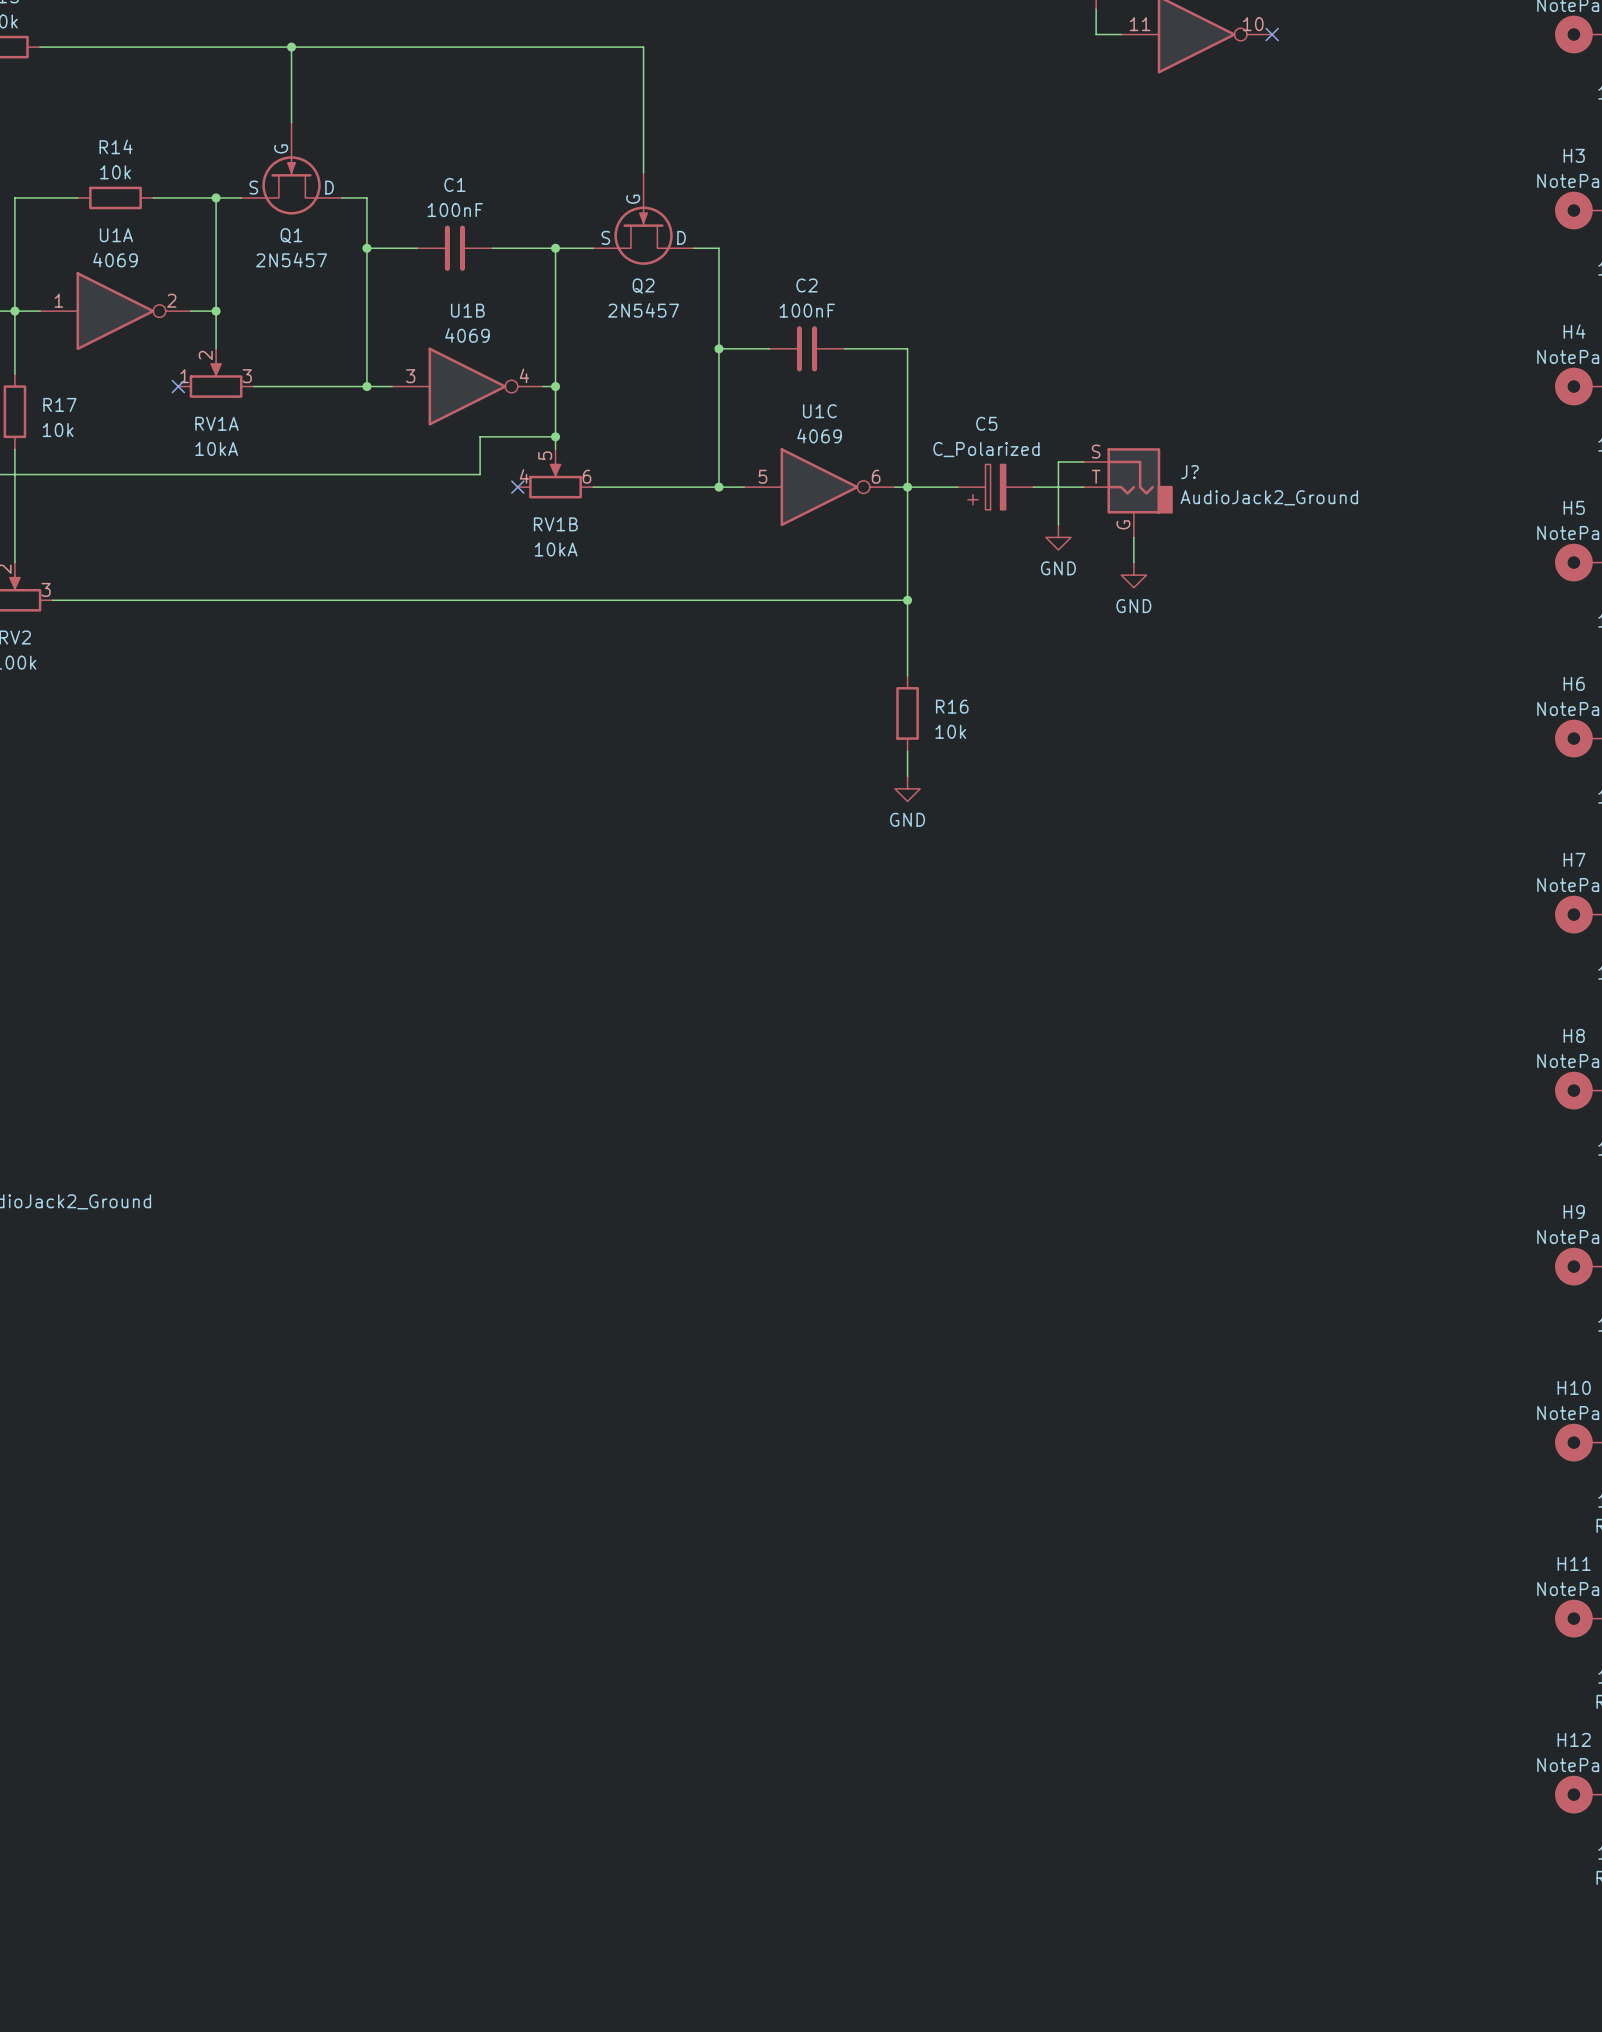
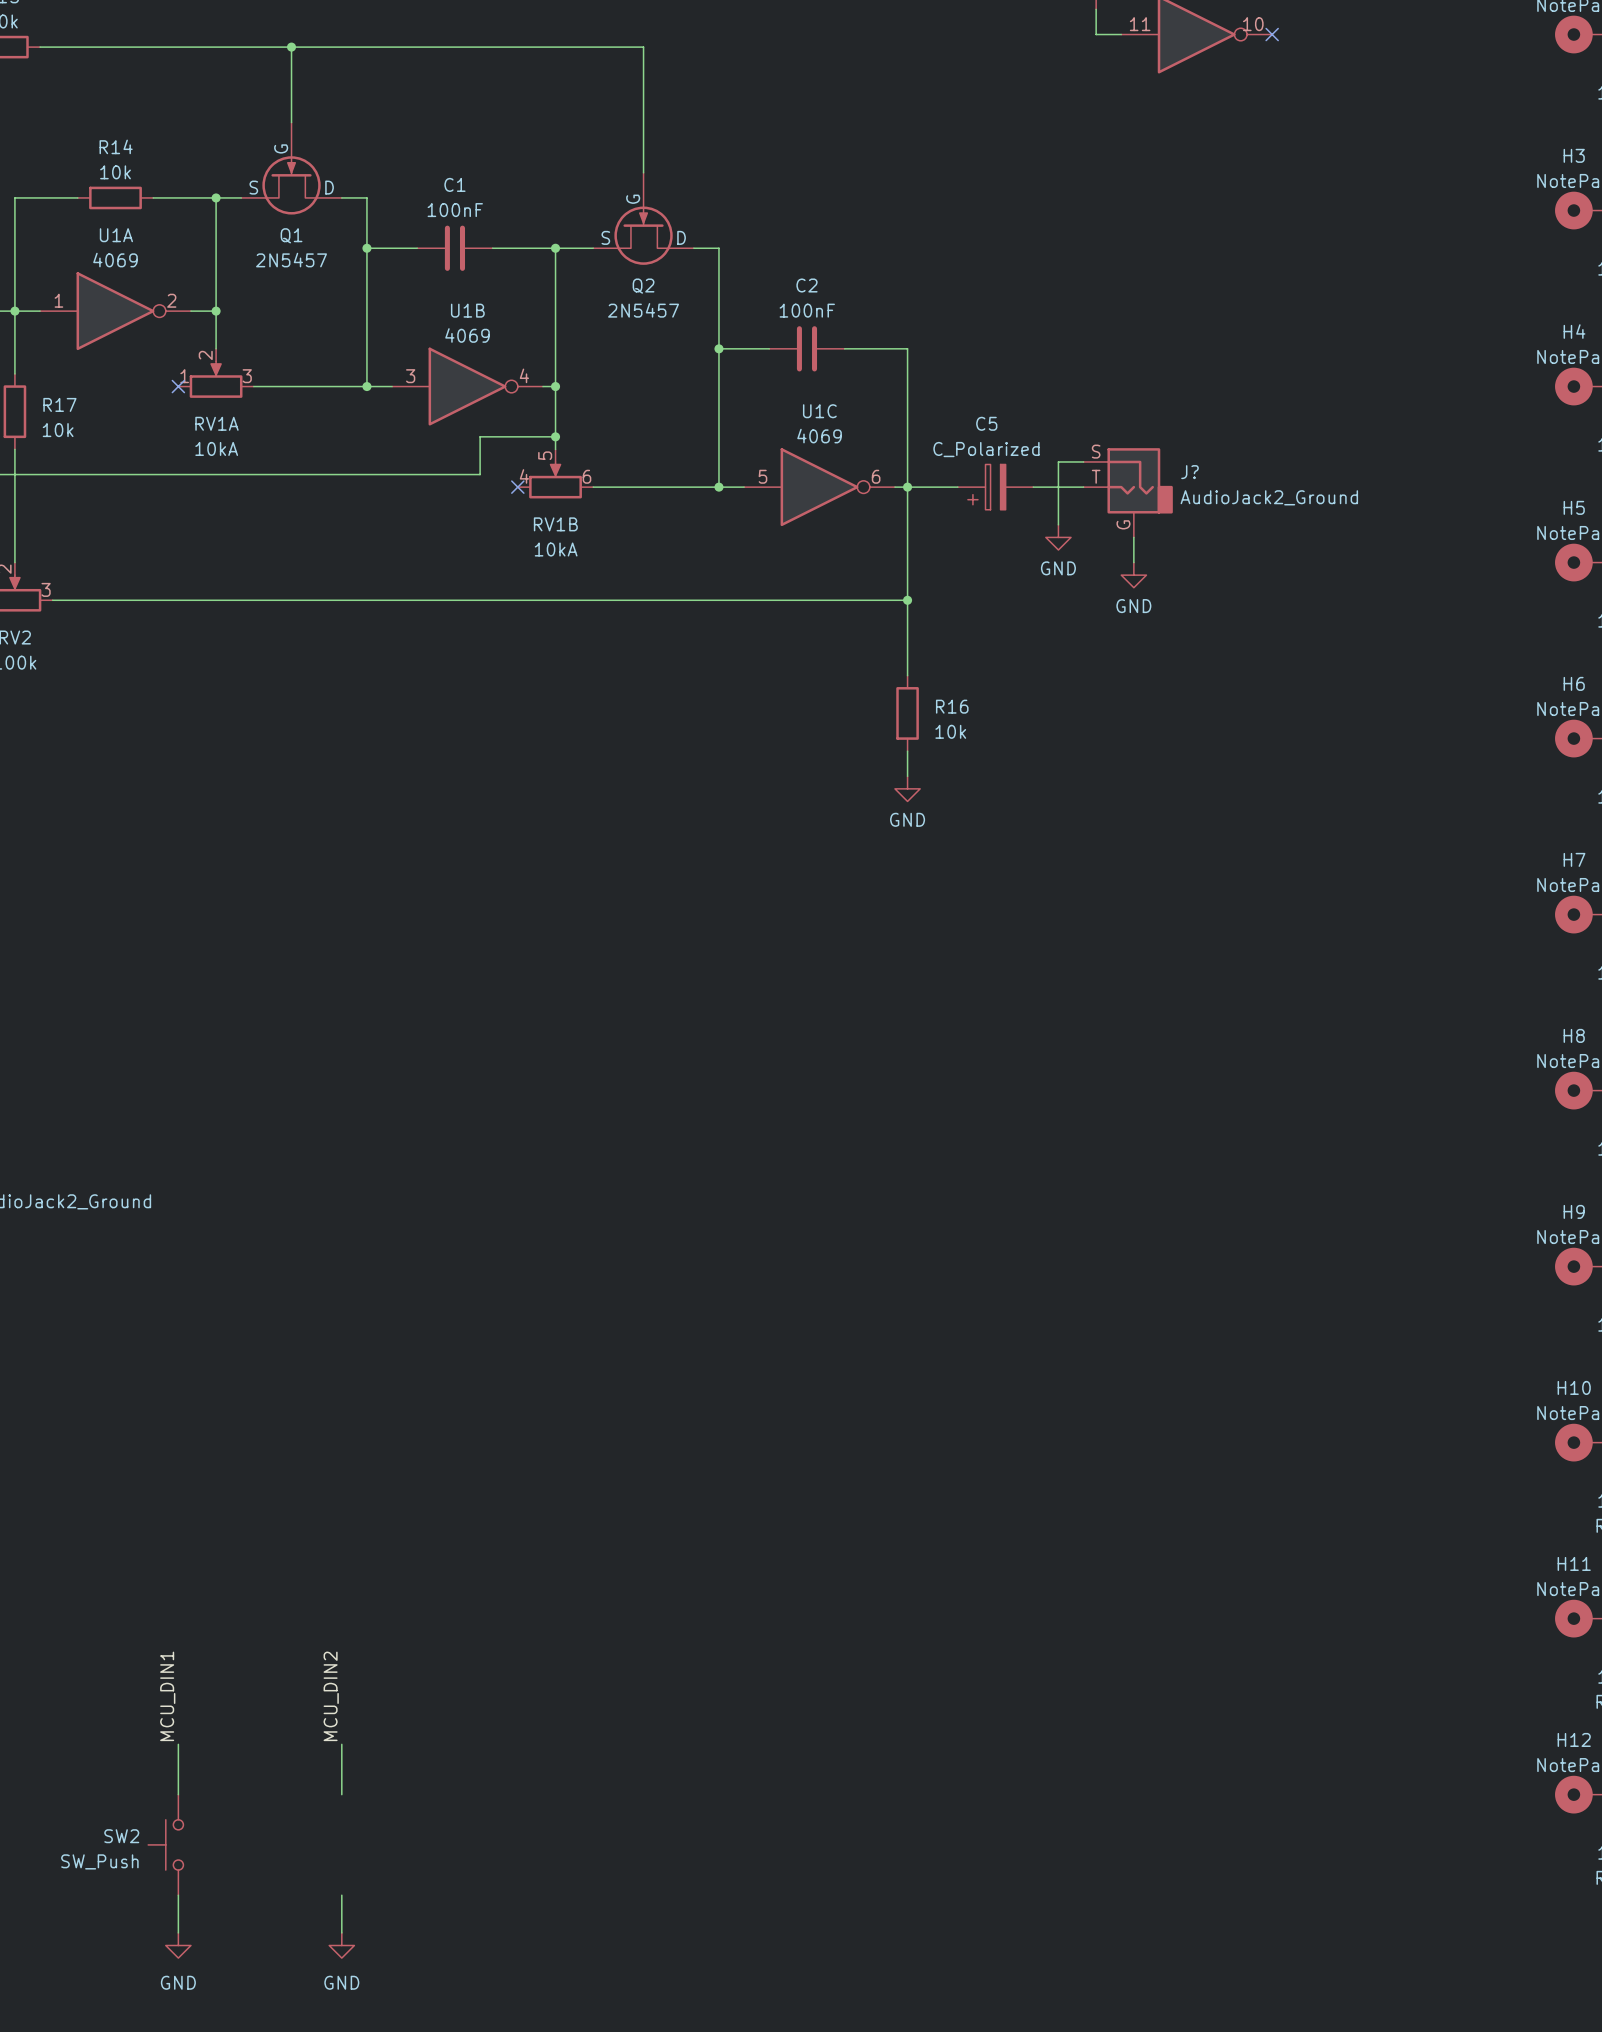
label: none -> MCU_DIN1 (167, 1696)
label: none -> MCU_DIN2 (331, 1696)
wire: none -> (178, 1744) (178, 1794)
wire: none -> (341, 1744) (341, 1794)
SW2: none -> SW_Push (165, 1844)
wire: none -> (178, 1895) (178, 1932)
wire: none -> (341, 1895) (341, 1932)
power symbol: none -> GND (178, 1945)
power symbol: none -> GND (341, 1945)

